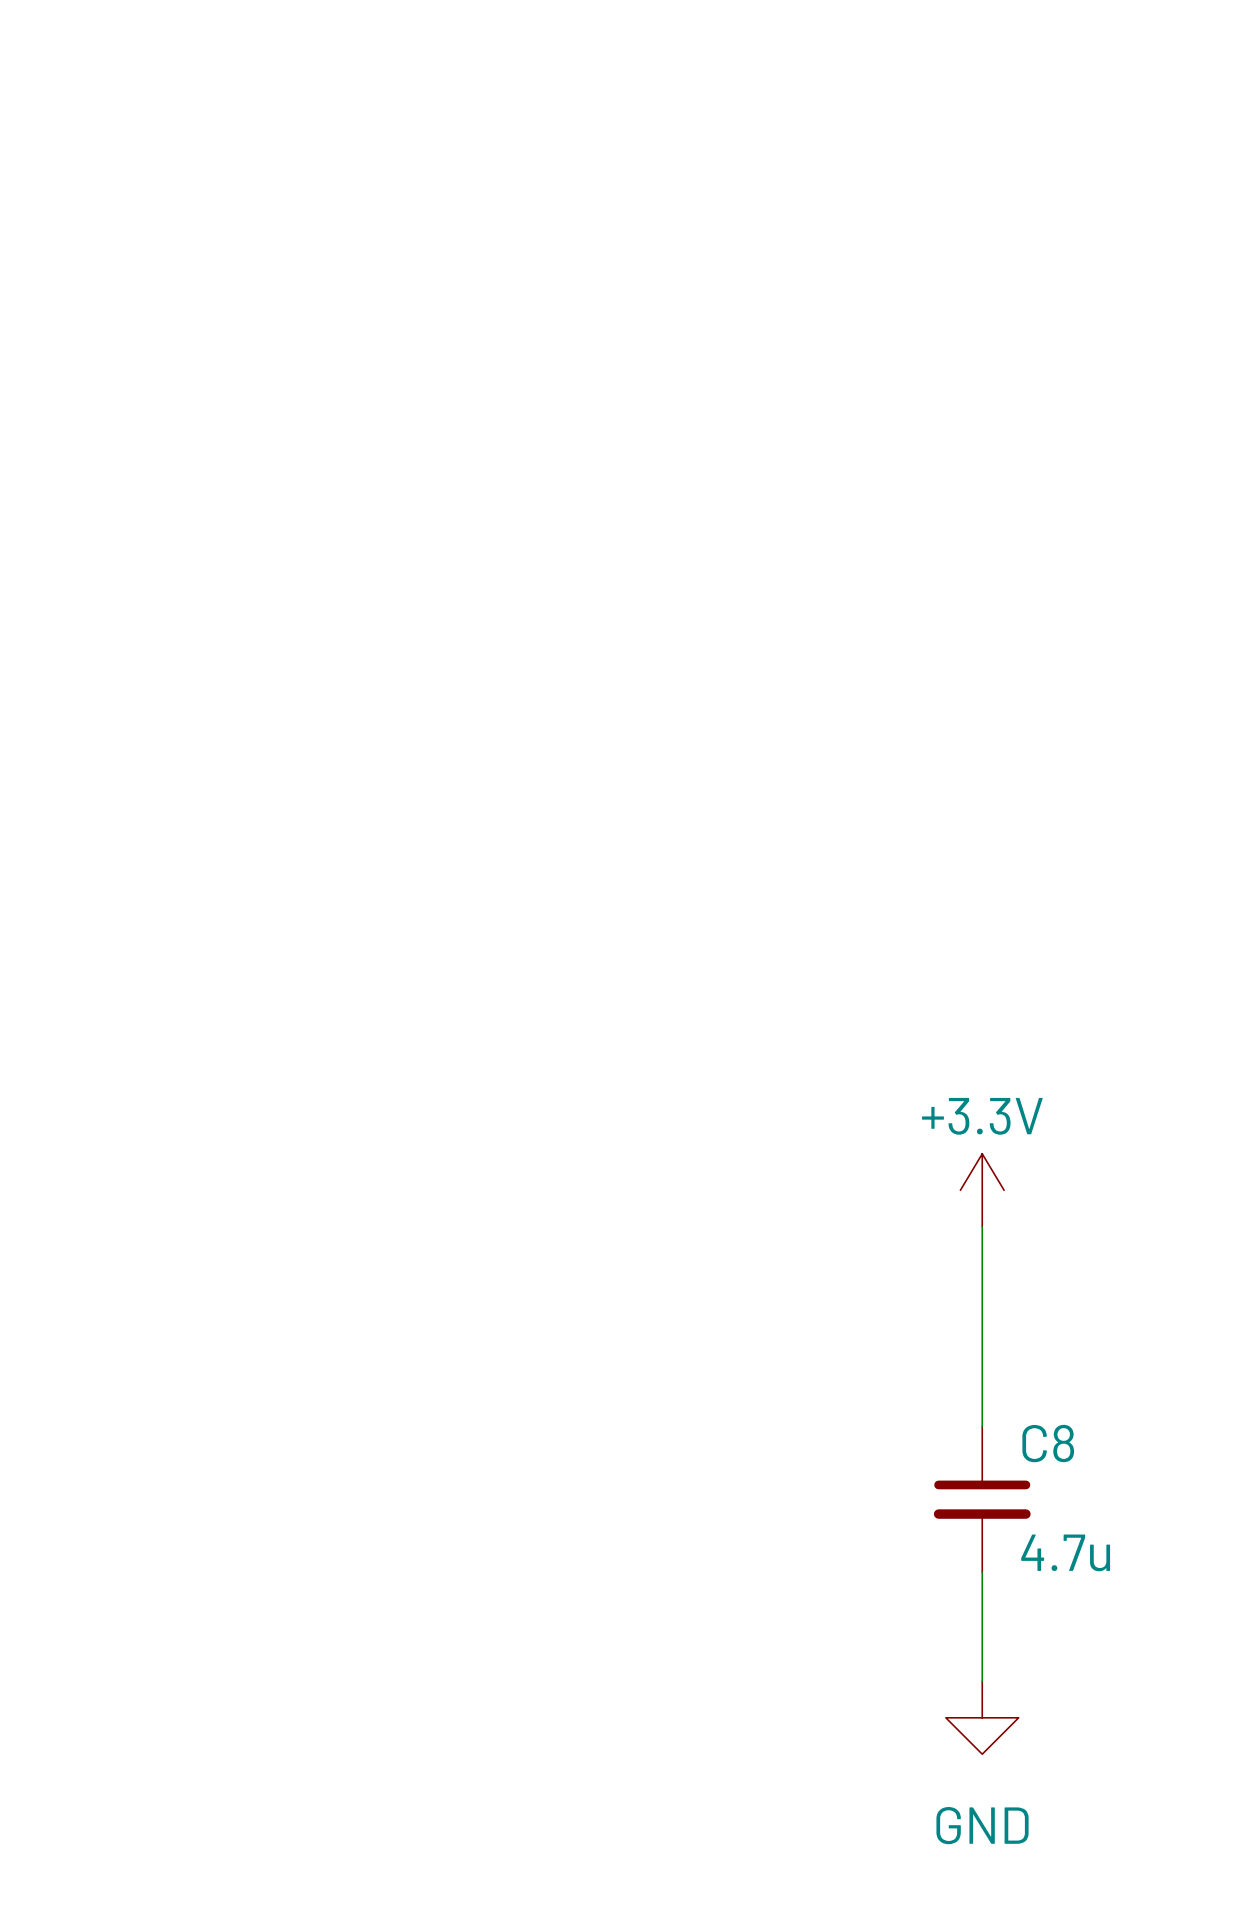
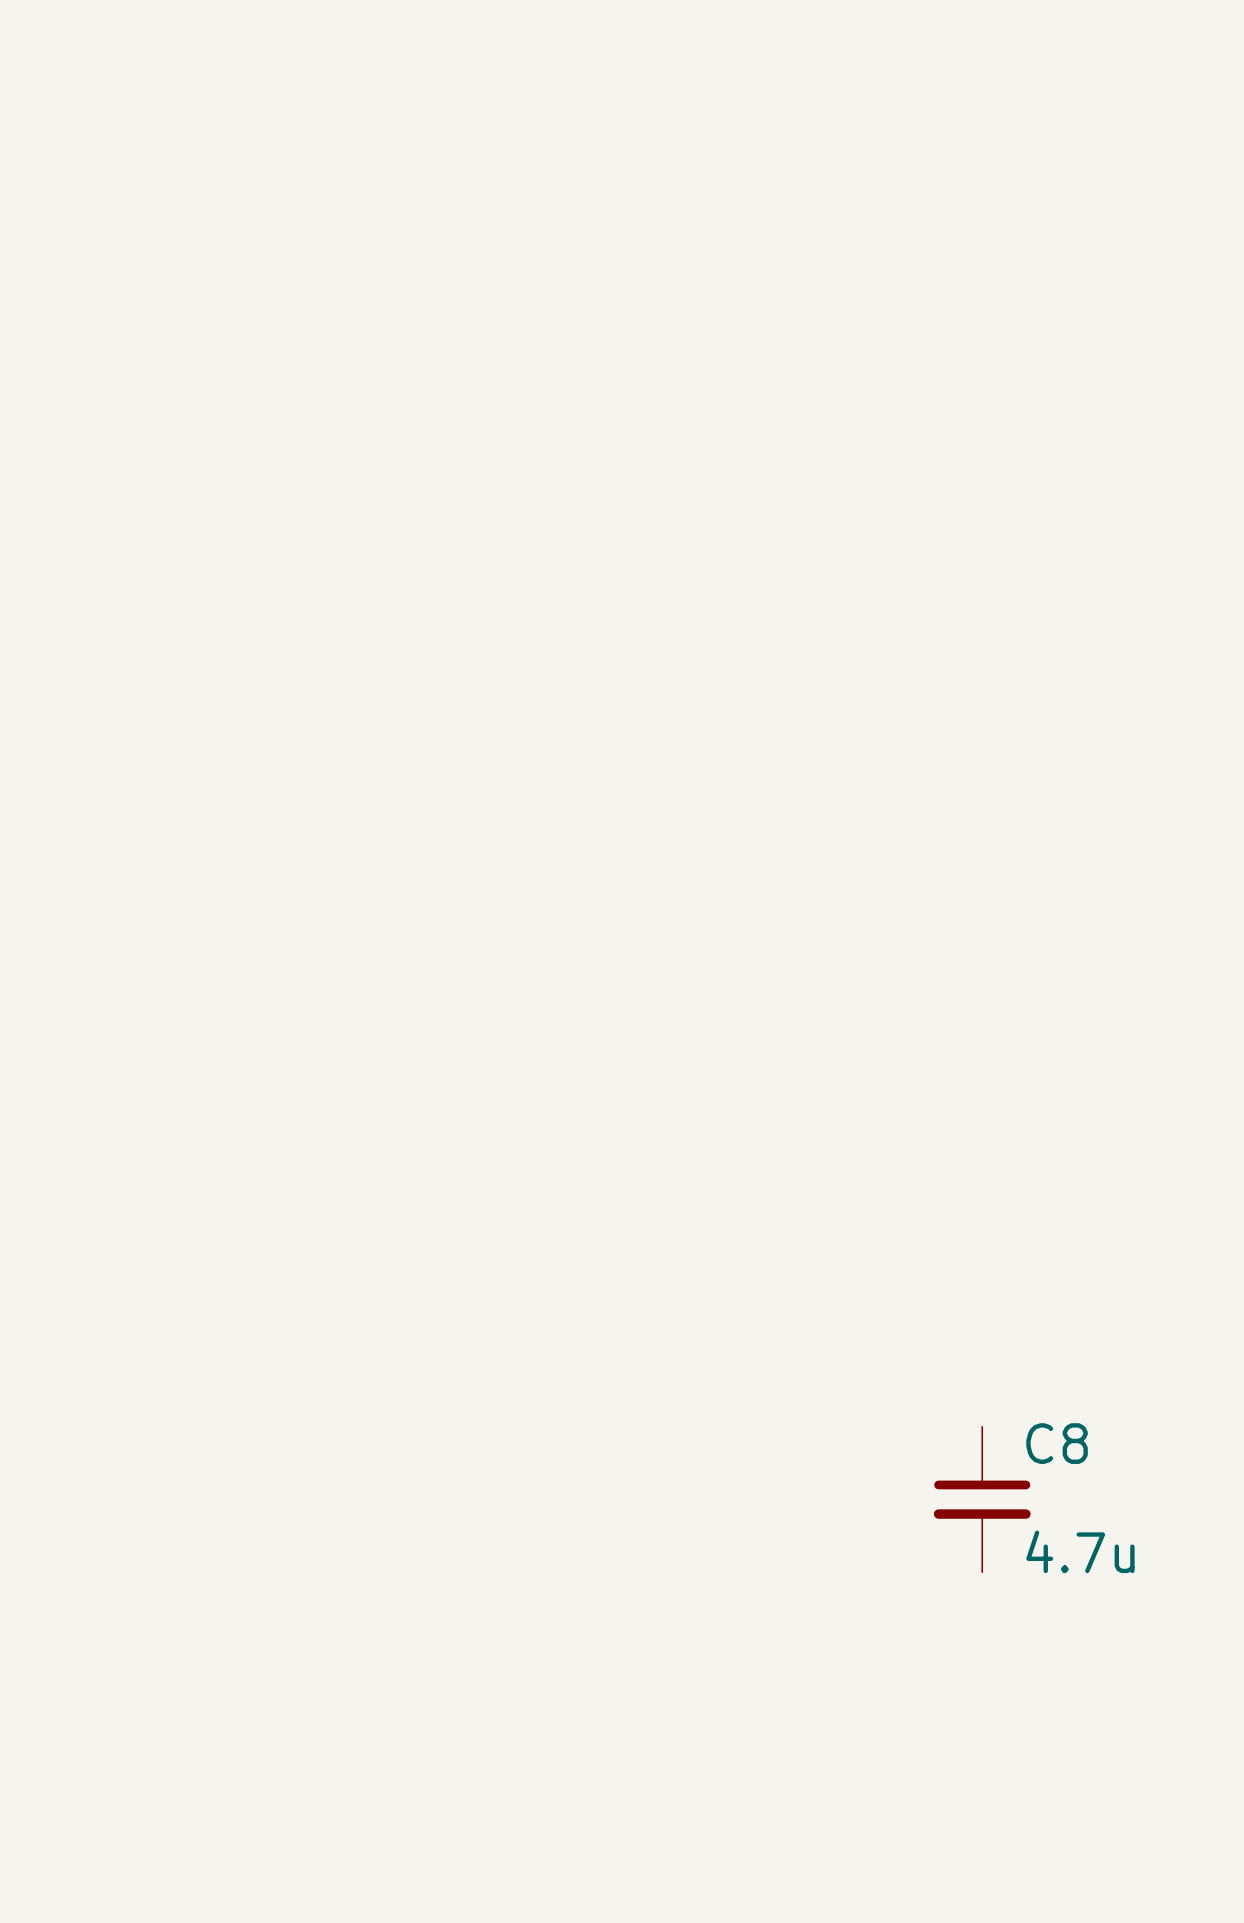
power symbol: +3.3V (982, 1190) -> none
wire: (982, 1226) (982, 1426) -> none
wire: (982, 1572) (982, 1681) -> none
power symbol: GND (982, 1717) -> none

